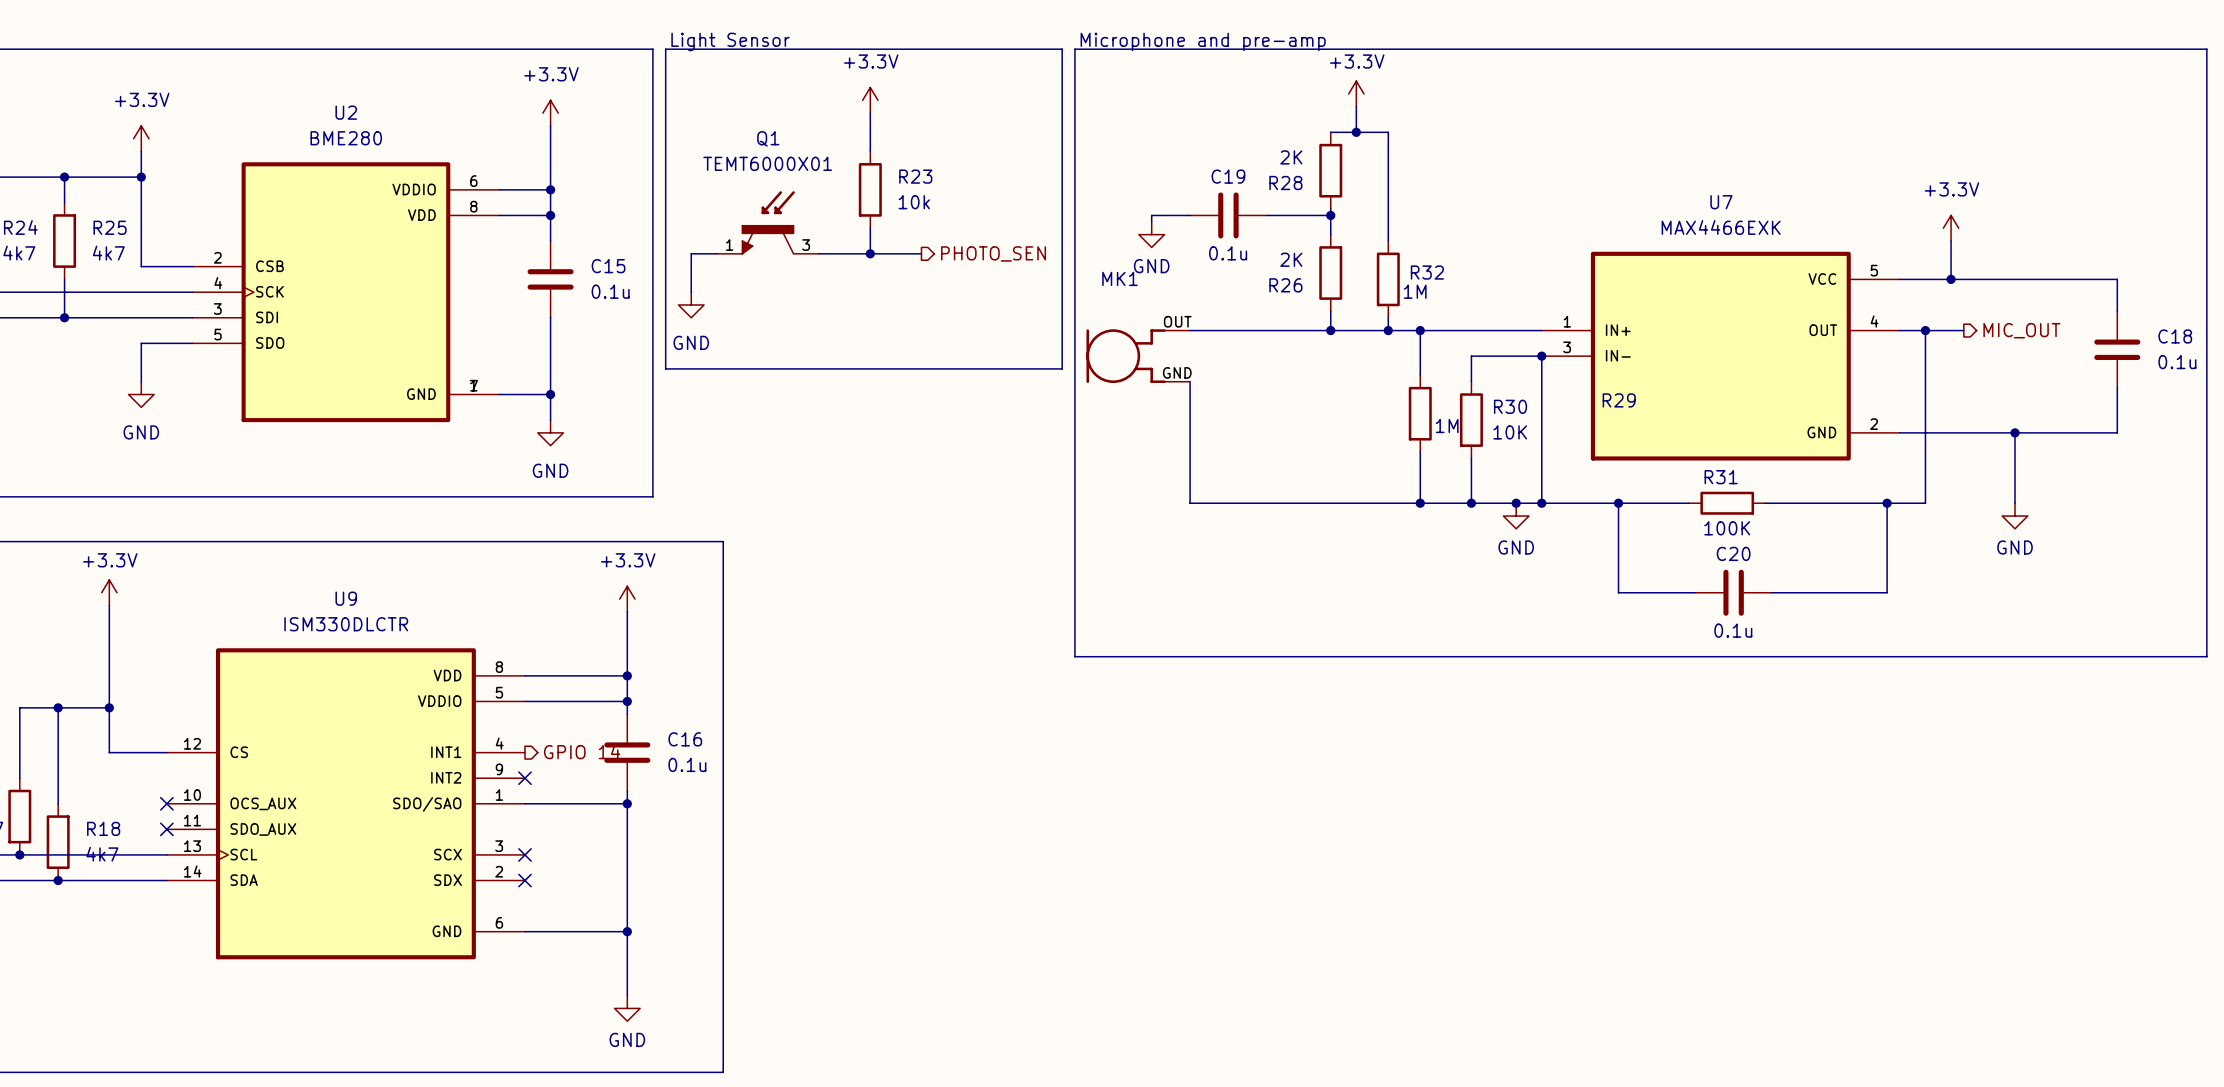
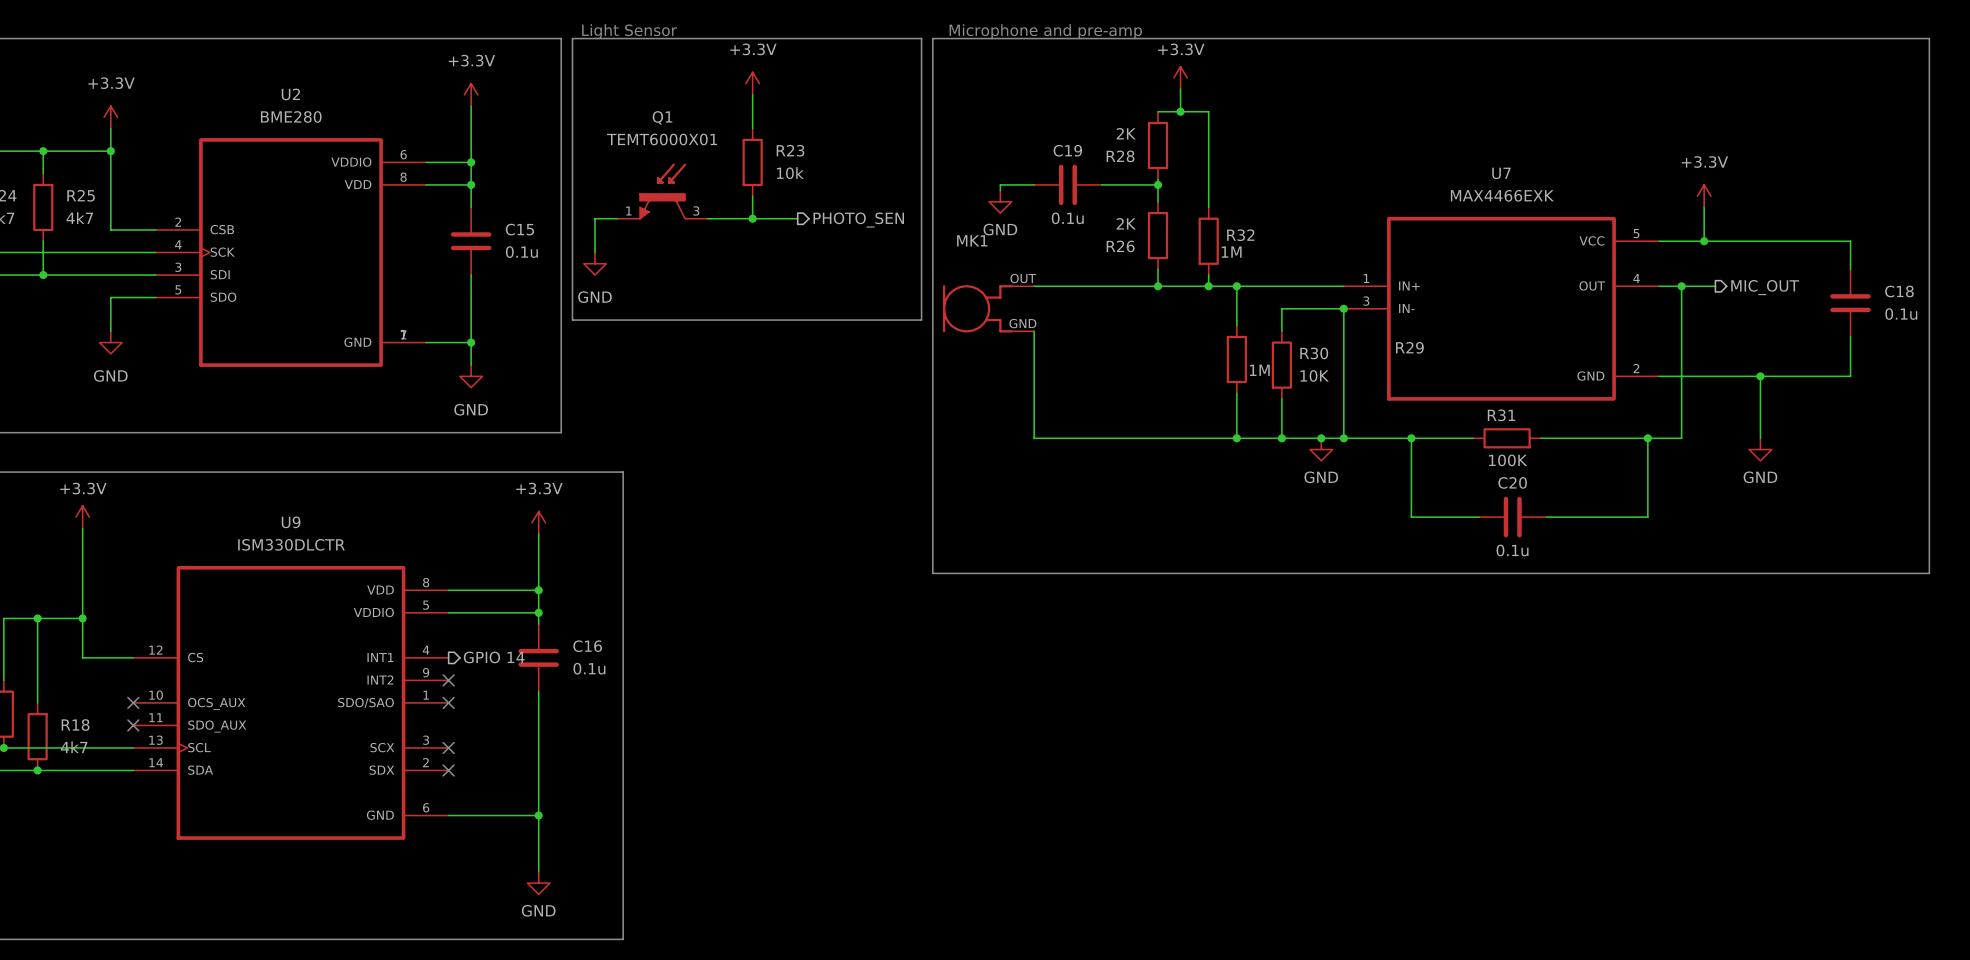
wire: (524, 803) (627, 803) -> none
no-connect mark: none -> (448, 702)
junction: (627, 803) -> none

